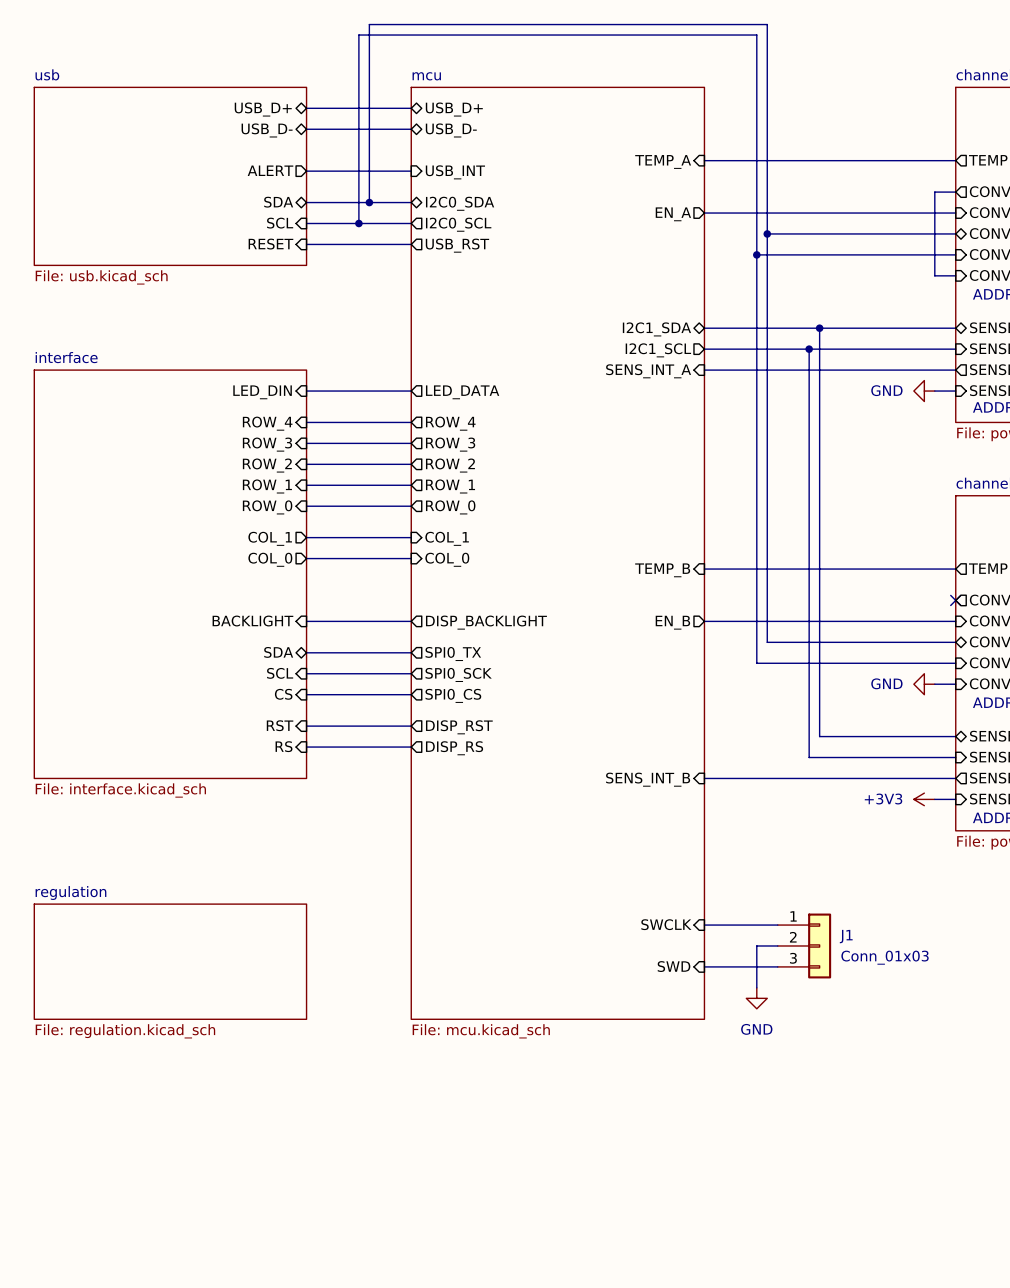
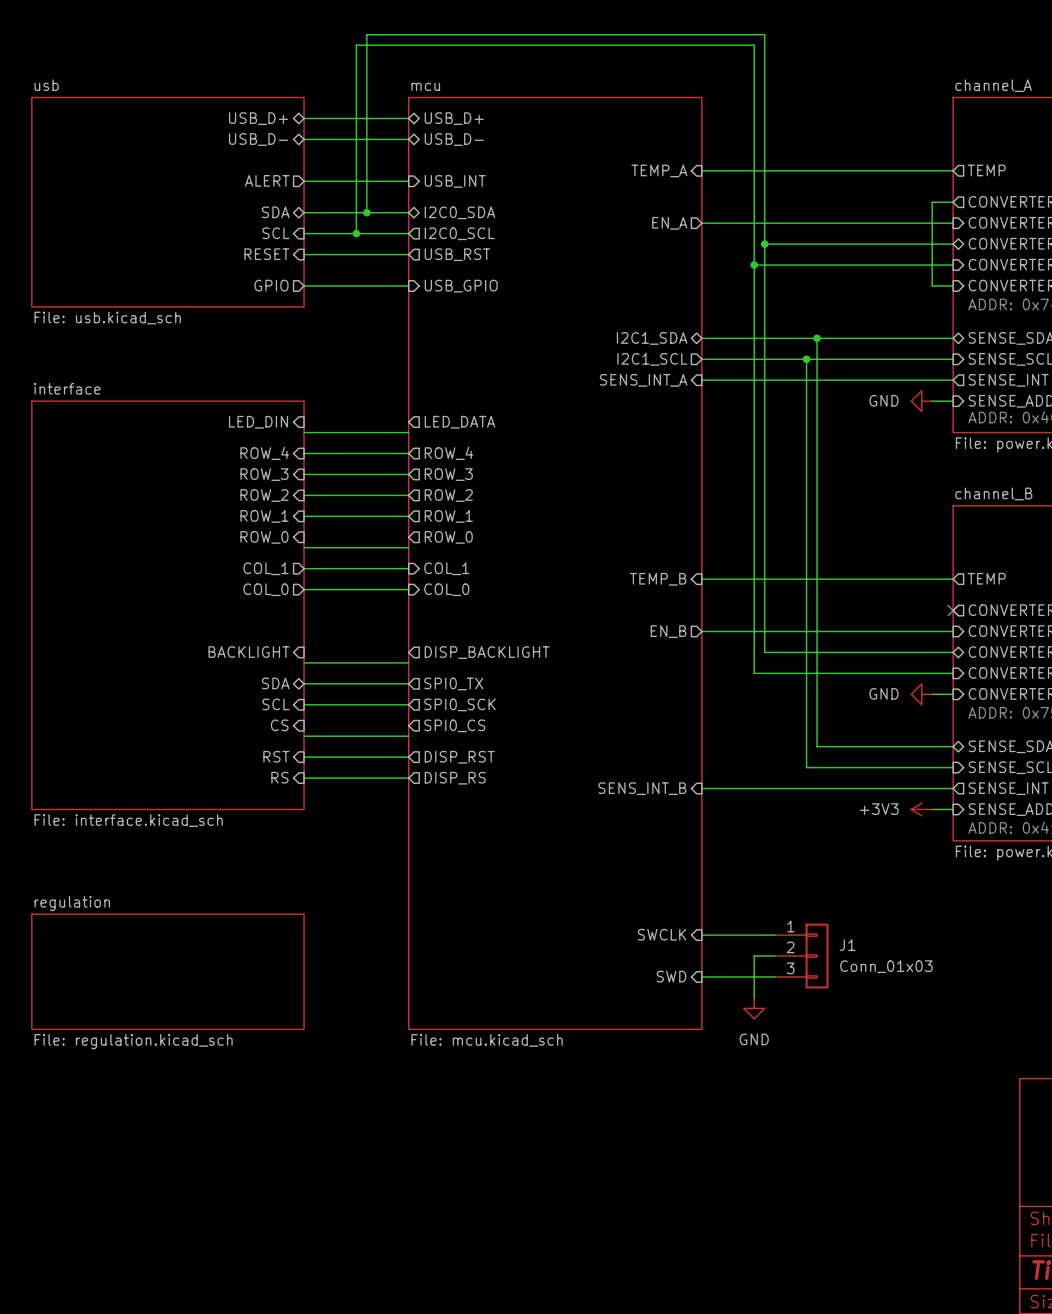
sheet usb: File: usb.kicad_sch (170, 176) -> none
sheet usb: none -> File: usb.kicad_sch (167, 202)
sheet pin: none -> GPIO (271, 285)
sheet pin: none -> USB_GPIO (461, 286)
wire: (306, 391) (411, 391) -> (304, 285) (408, 285)
sheet pin position: LED_DIN (262, 392) -> LED_DIN (258, 422)
sheet pin position: LED_DATA (462, 392) -> LED_DATA (459, 422)
sheet pin: ROW_4 (267, 423) -> none
sheet pin: ROW_4 (450, 423) -> none
sheet pin: ROW_3 (267, 444) -> ROW_4 (264, 453)
sheet pin: ROW_3 (450, 444) -> ROW_4 (449, 453)
sheet pin: ROW_2 (267, 465) -> ROW_3 (264, 474)
sheet pin: ROW_2 (450, 465) -> ROW_3 (448, 474)
sheet pin: ROW_1 (267, 486) -> ROW_2 (264, 495)
sheet pin: ROW_1 (450, 486) -> ROW_2 (448, 495)
sheet pin: ROW_0 (267, 507) -> ROW_1 (264, 516)
sheet pin: ROW_0 (450, 507) -> ROW_1 (448, 516)
sheet pin: none -> ROW_0 (264, 537)
sheet pin: none -> ROW_0 (448, 537)
sheet pin: COL_1 (270, 538) -> none
sheet pin: COL_1 (447, 538) -> none
sheet pin: COL_0 (270, 559) -> COL_1 (265, 568)
sheet pin: COL_0 (447, 559) -> COL_1 (446, 568)
sheet interface position: (170, 574) -> (167, 605)
sheet pin: none -> COL_0 (265, 589)
sheet pin: none -> COL_0 (446, 589)
sheet pin position: BACKLIGHT (252, 621) -> BACKLIGHT (249, 652)
wire: (306, 621) (411, 621) -> (304, 589) (408, 589)
sheet pin position: DISP_BACKLIGHT (486, 622) -> DISP_BACKLIGHT (487, 652)
sheet pin: SDA (278, 652) -> none
sheet pin: SPI0_TX (453, 654) -> none
sheet pin shape: input (280, 673) -> bidirectional (275, 683)
sheet pin: SCL (280, 673) -> SDA (275, 683)
sheet pin: SPI0_SCK (458, 674) -> SPI0_TX (453, 683)
sheet pin: CS (283, 694) -> SCL (275, 704)
sheet pin: SPI0_CS (453, 695) -> SPI0_SCK (459, 704)
sheet pin: none -> CS (279, 725)
sheet pin: none -> SPI0_CS (454, 725)
sheet pin: RST (280, 725) -> none
sheet pin: DISP_RST (459, 727) -> none
sheet pin: RS (284, 746) -> RST (276, 756)
sheet pin: DISP_RS (454, 748) -> DISP_RST (459, 757)
sheet pin: none -> RS (279, 777)
wire: none -> (304, 778) (408, 778)
sheet pin: none -> DISP_RS (455, 778)

